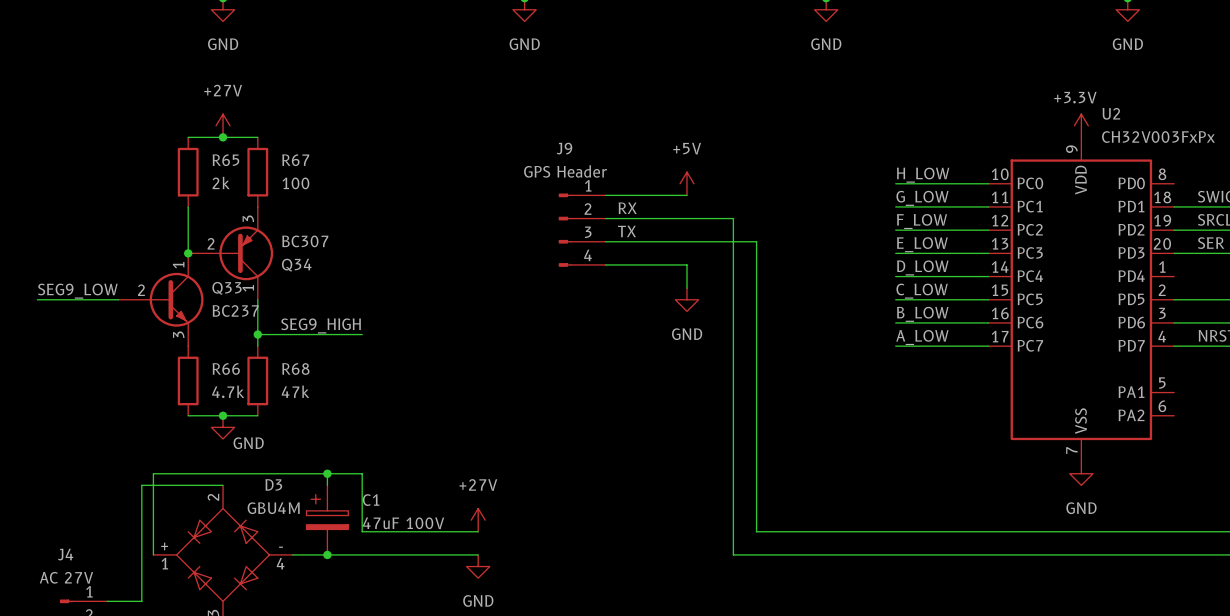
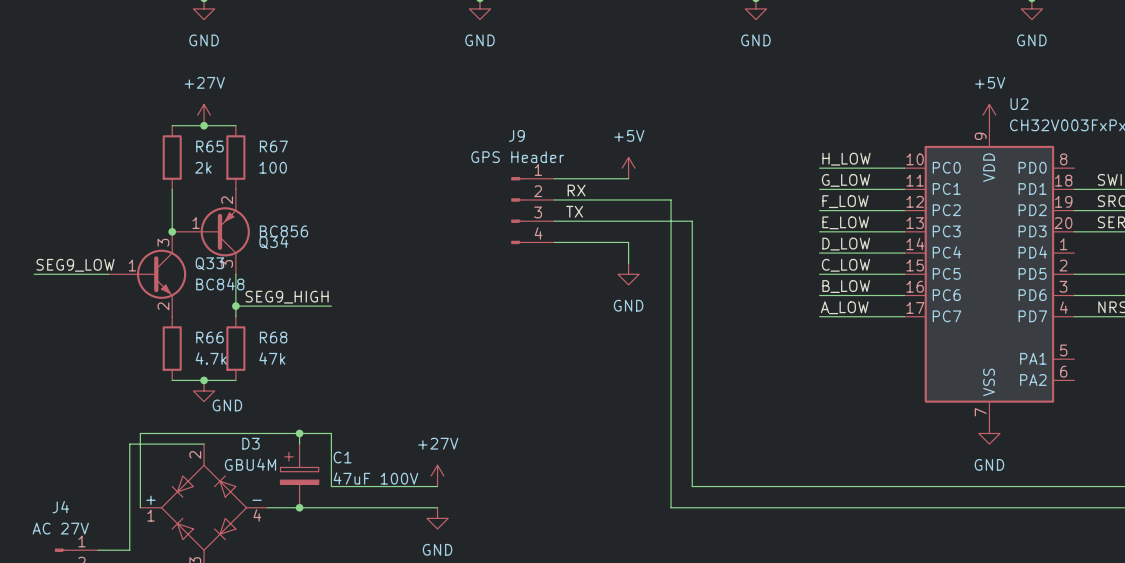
power symbol: +3.3V (1081, 125) -> +5V (989, 115)
Q34 symbol: [188, 206, 274, 300] -> [172, 189, 250, 275]
Q34 value: BC307 (305, 241) -> BC856 (283, 231)
Q33 symbol: [118, 253, 204, 347] -> [108, 231, 187, 317]
Q33 value: BC237 (235, 311) -> BC848 (220, 284)

